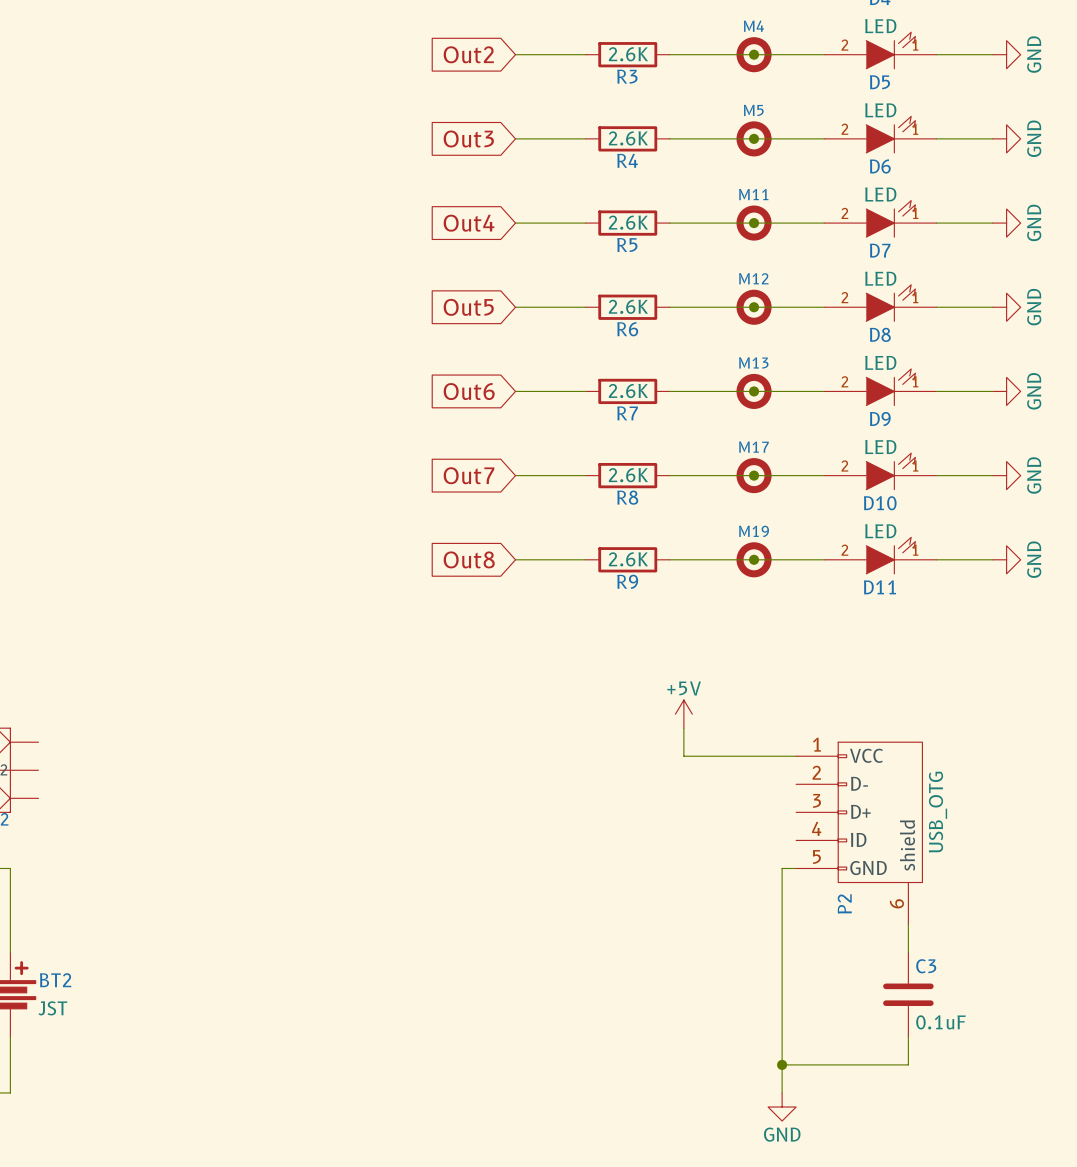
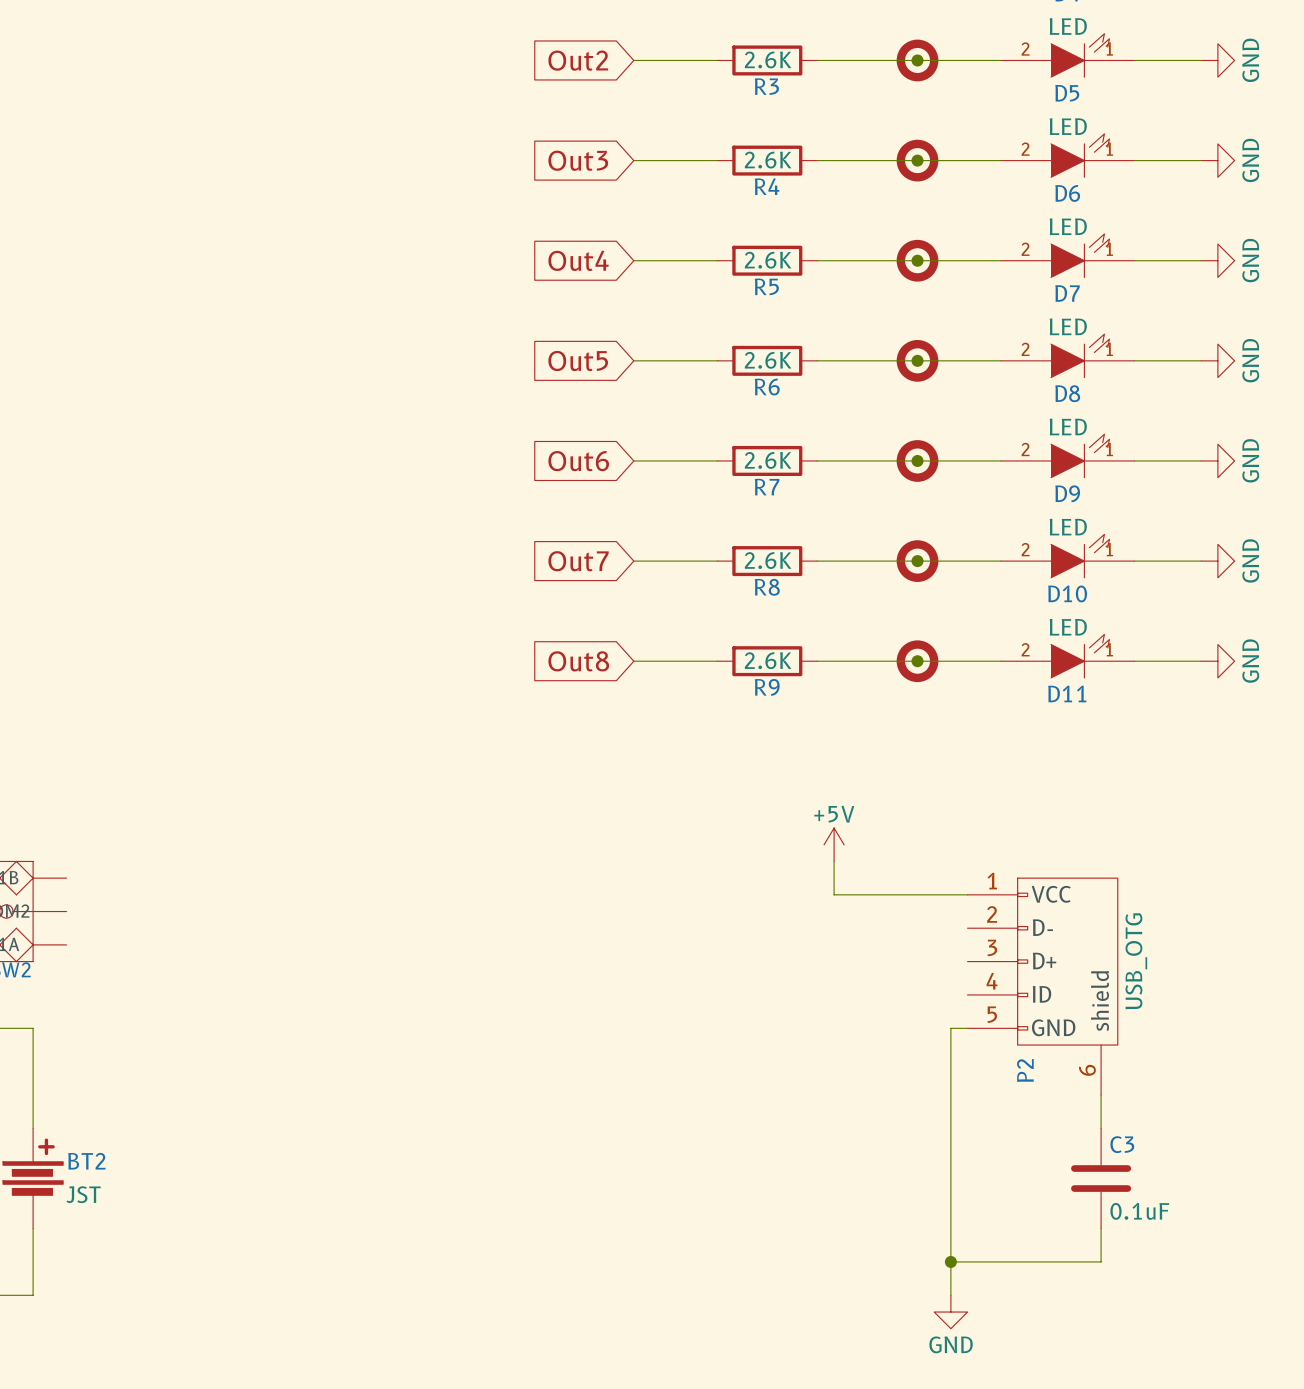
M4 name: M4 (753, 26) -> none
M5 name: M5 (753, 110) -> none
M11 name: M11 (753, 194) -> none
M12 name: M12 (753, 278) -> none
M13 name: M13 (753, 362) -> none
M17 name: M17 (753, 447) -> none
M19 name: M19 (754, 531) -> none

